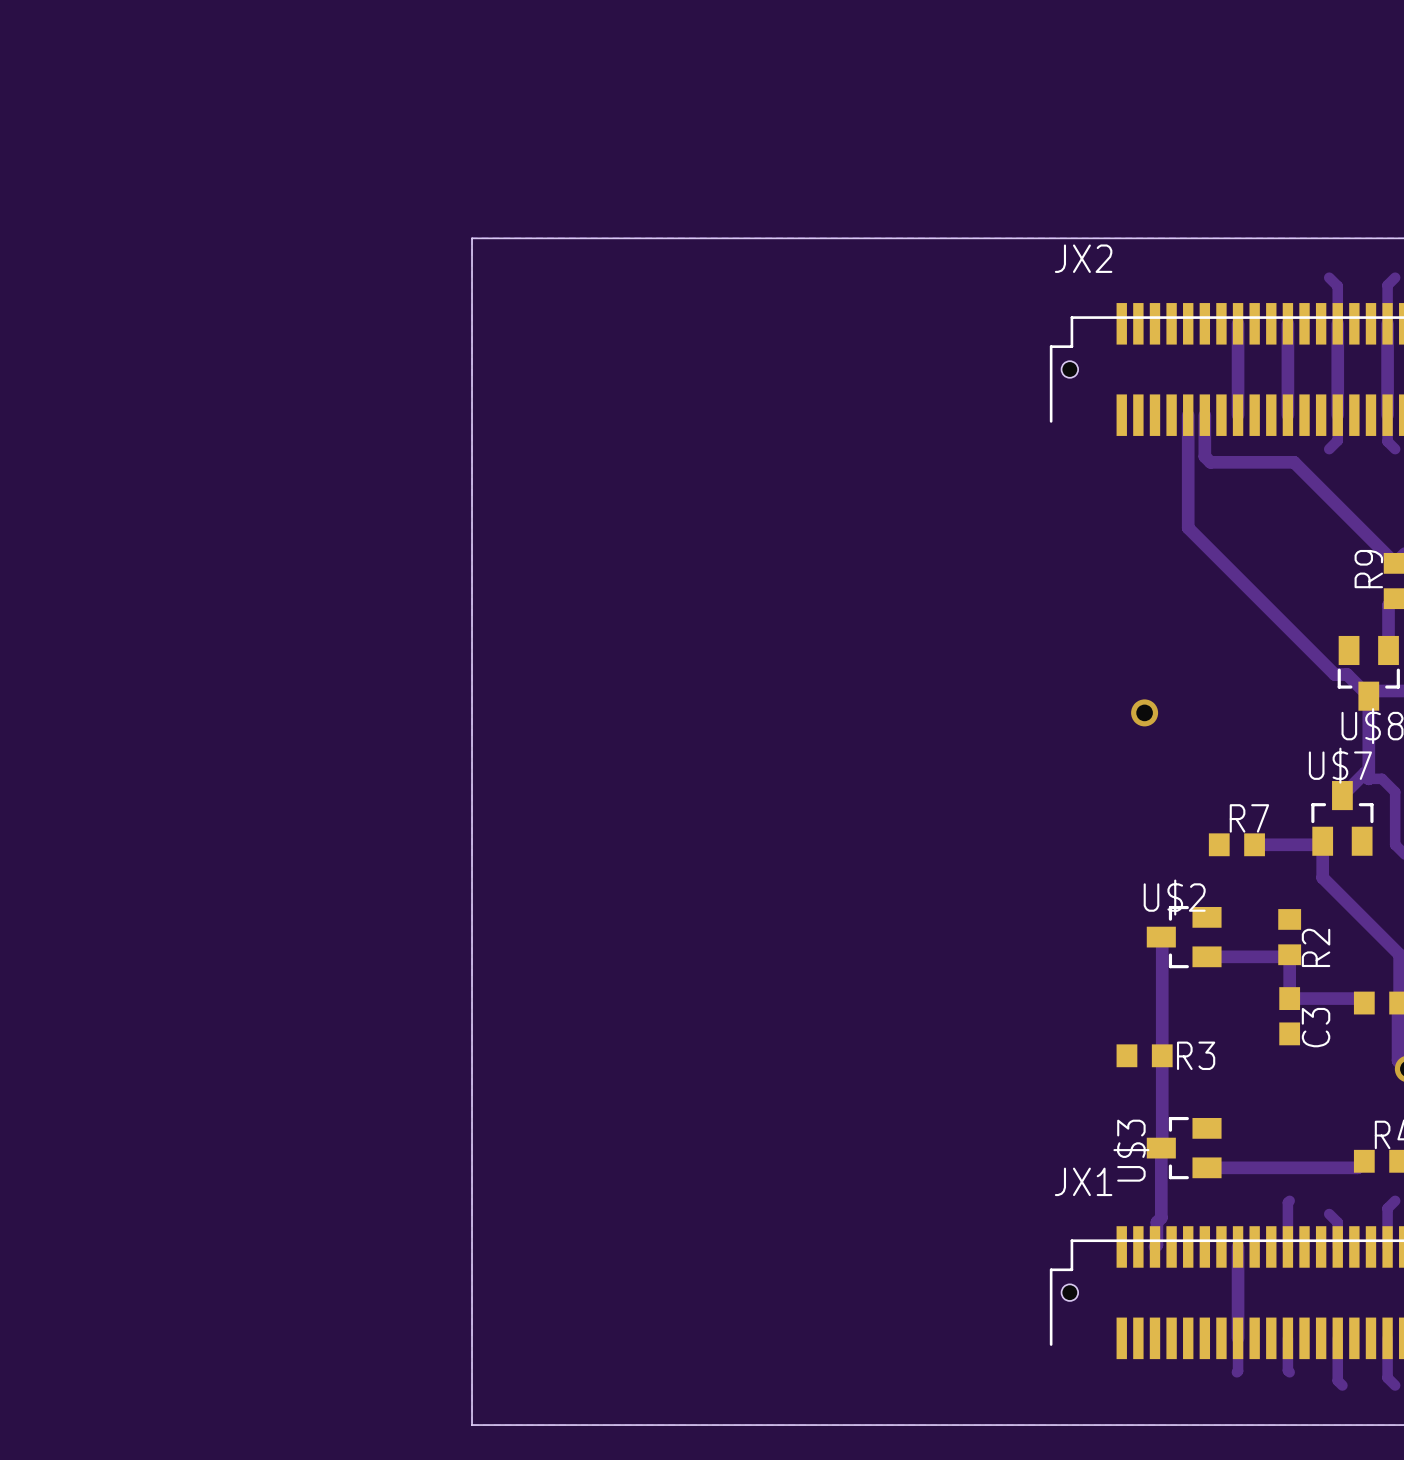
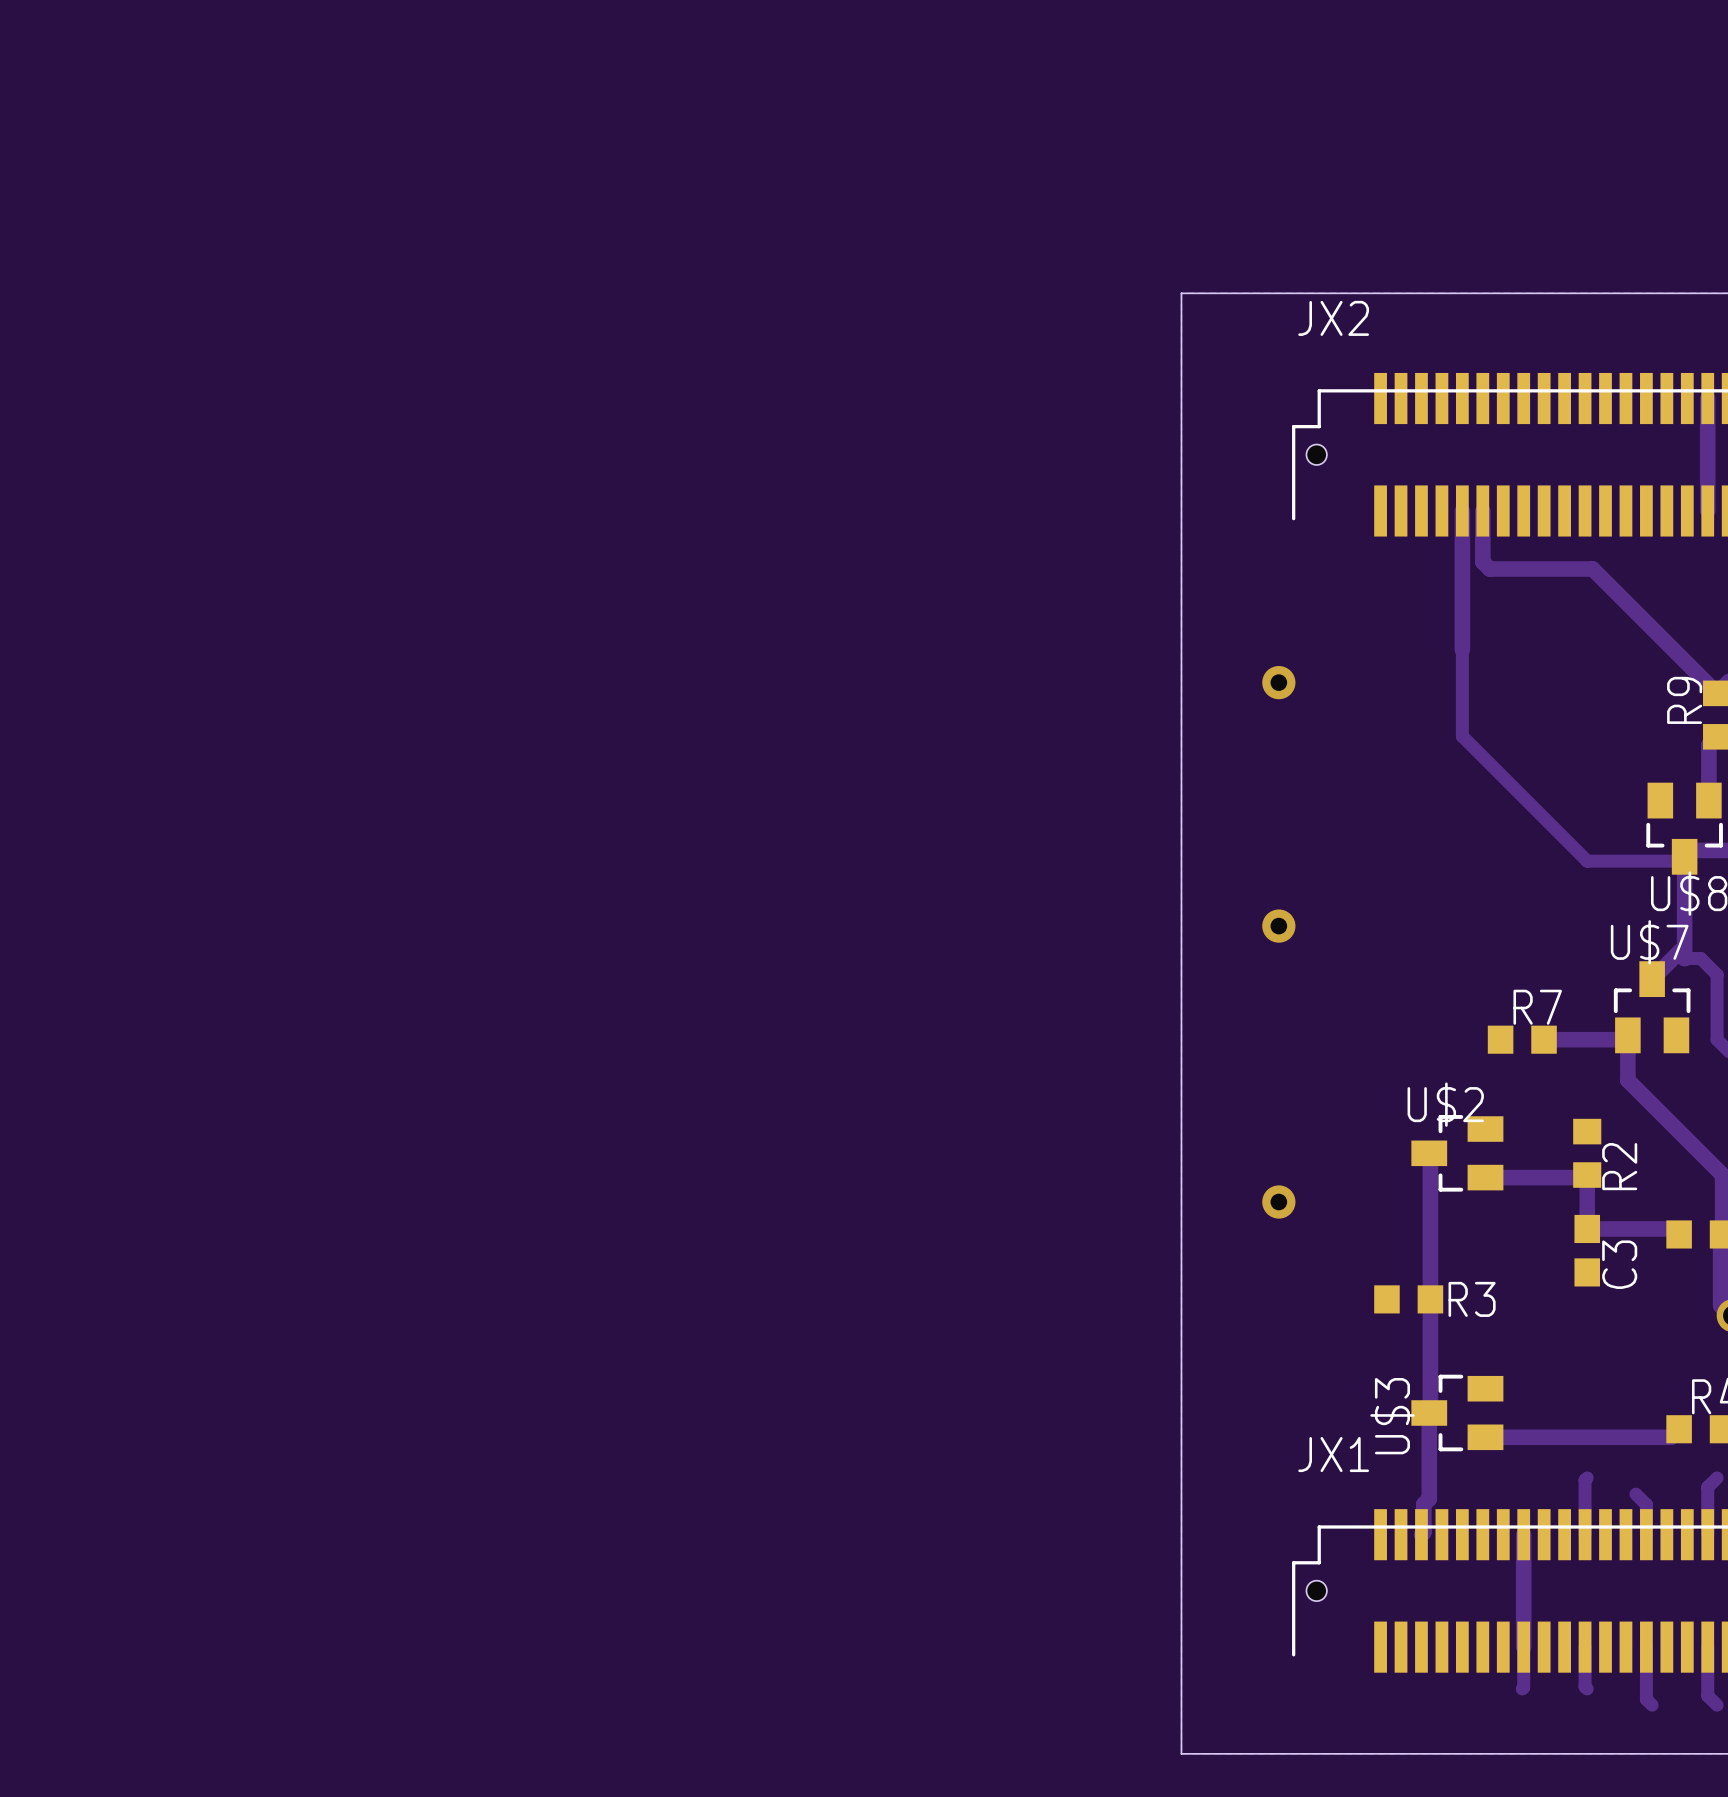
board edge: (959, 238) (472, 238) (472, 1425) (959, 1425) -> (1181, 293) (1181, 1753)
track: (1329, 277) (1337, 286) (1337, 440) (1329, 449) -> none
track: (1395, 277) (1387, 285) (1387, 323) -> none
track: (1238, 323) (1238, 415) -> none
track: (1287, 323) (1287, 415) -> none
track: (1387, 415) (1387, 441) (1395, 449) -> none
track: (1188, 527) (1334, 674) (1347, 674) (1368, 696) -> (1462, 649) (1462, 736) (1587, 861) (1684, 861)
via: none -> (1278, 682)
via: (1144, 712) -> none
via: none -> (1278, 926)
via: none -> (1278, 1202)

